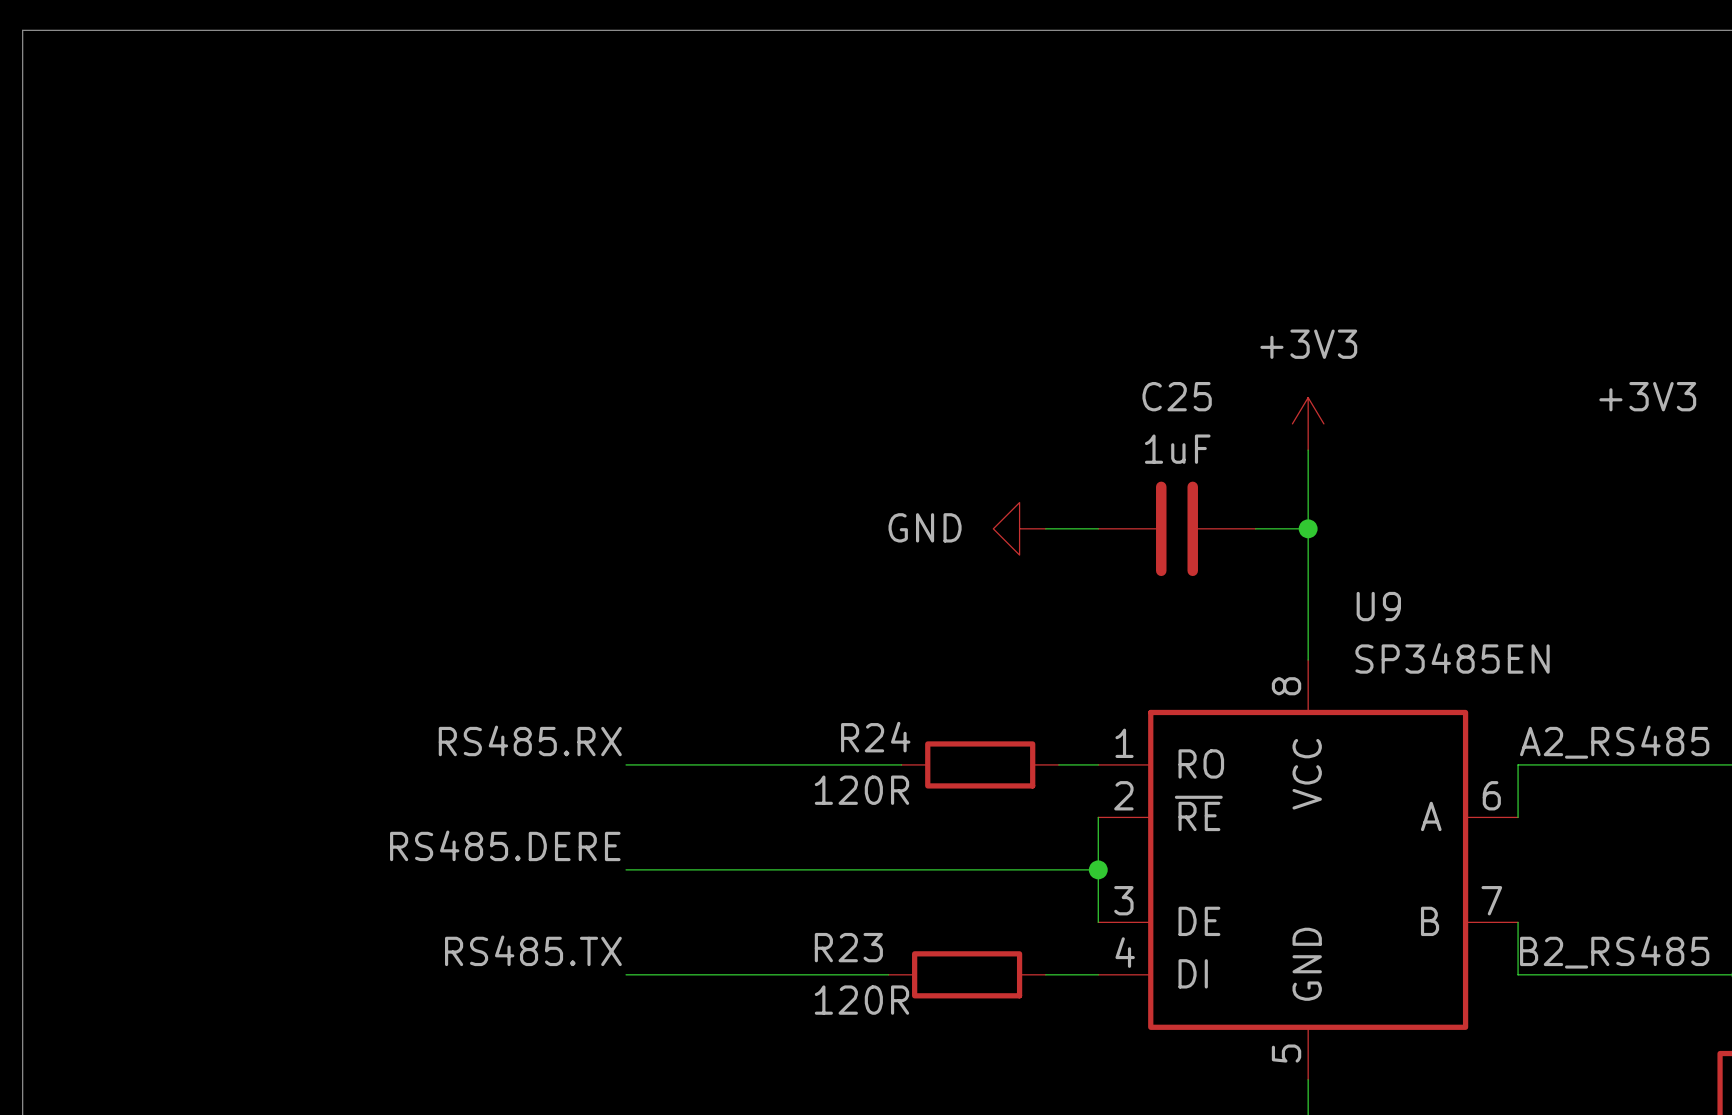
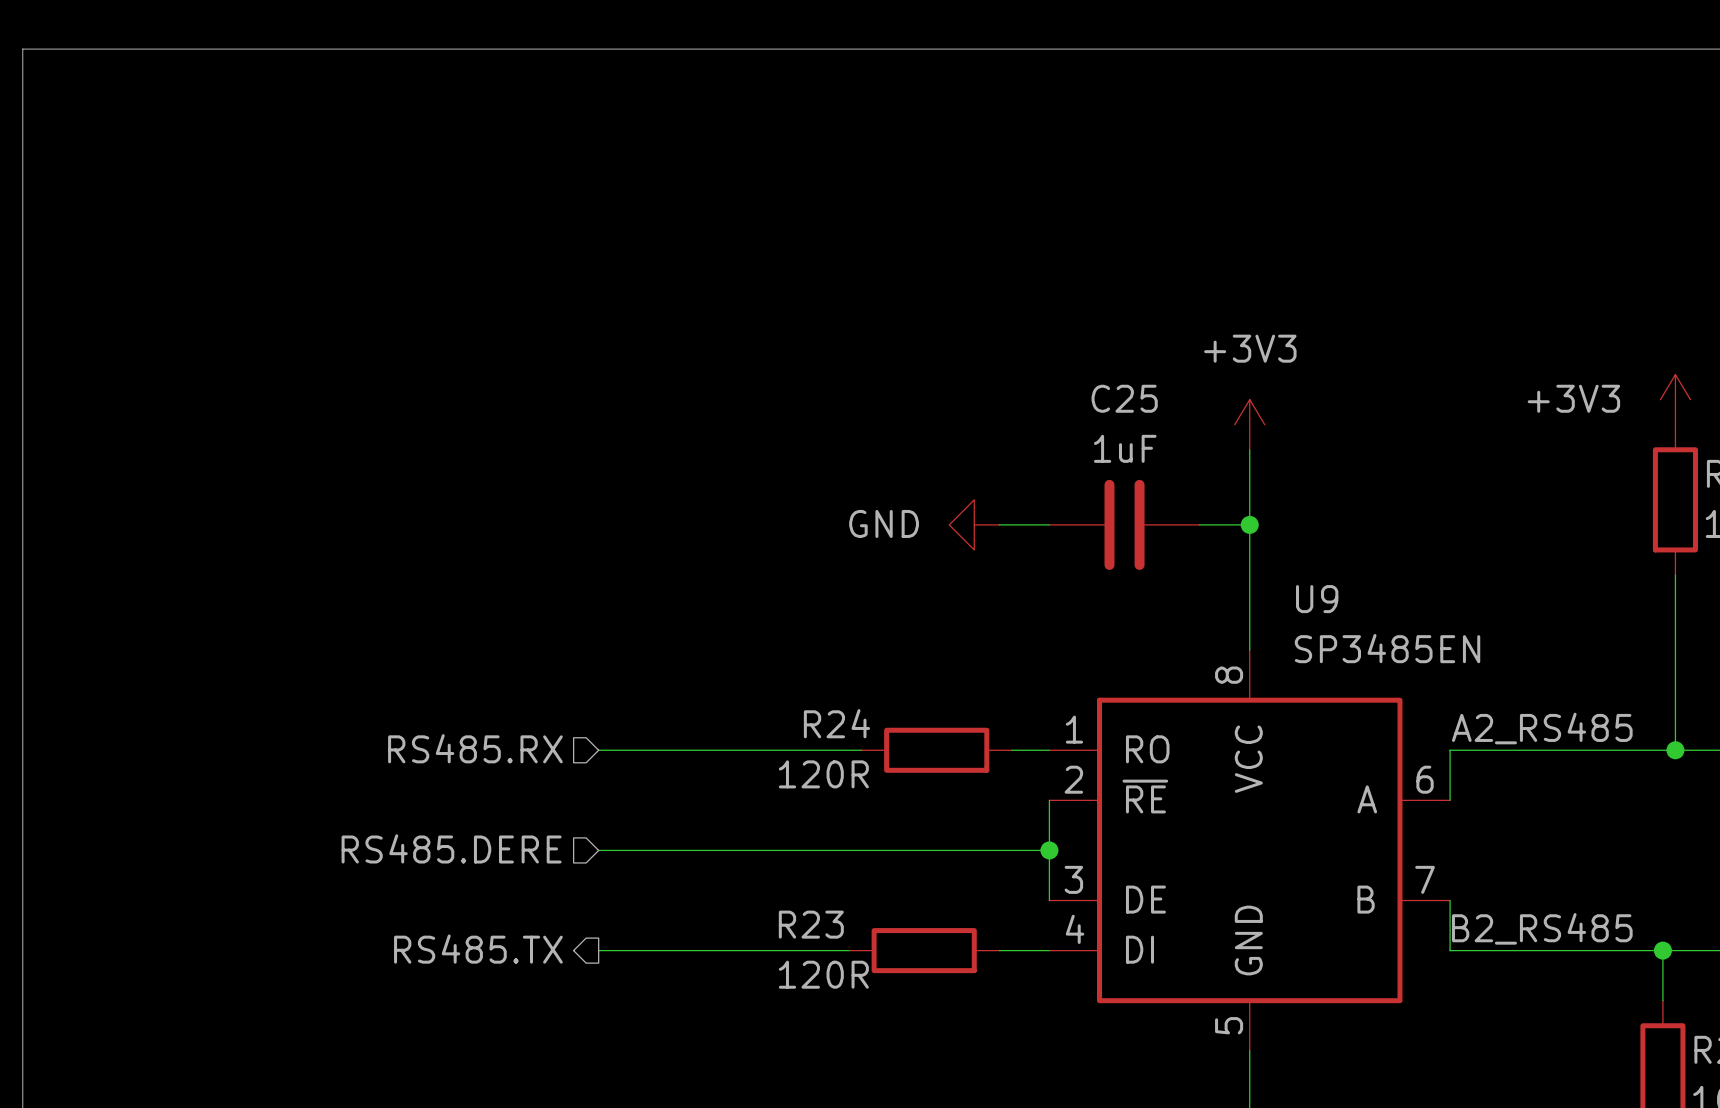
label: RS485.RX (530, 740) -> none
hierarchical label: none -> RS485.RX (475, 748)
label: RS485.DERE (505, 845) -> none
hierarchical label: none -> RS485.DERE (451, 848)
label: RS485.TX (533, 950) -> none
hierarchical label: none -> RS485.TX (478, 949)

